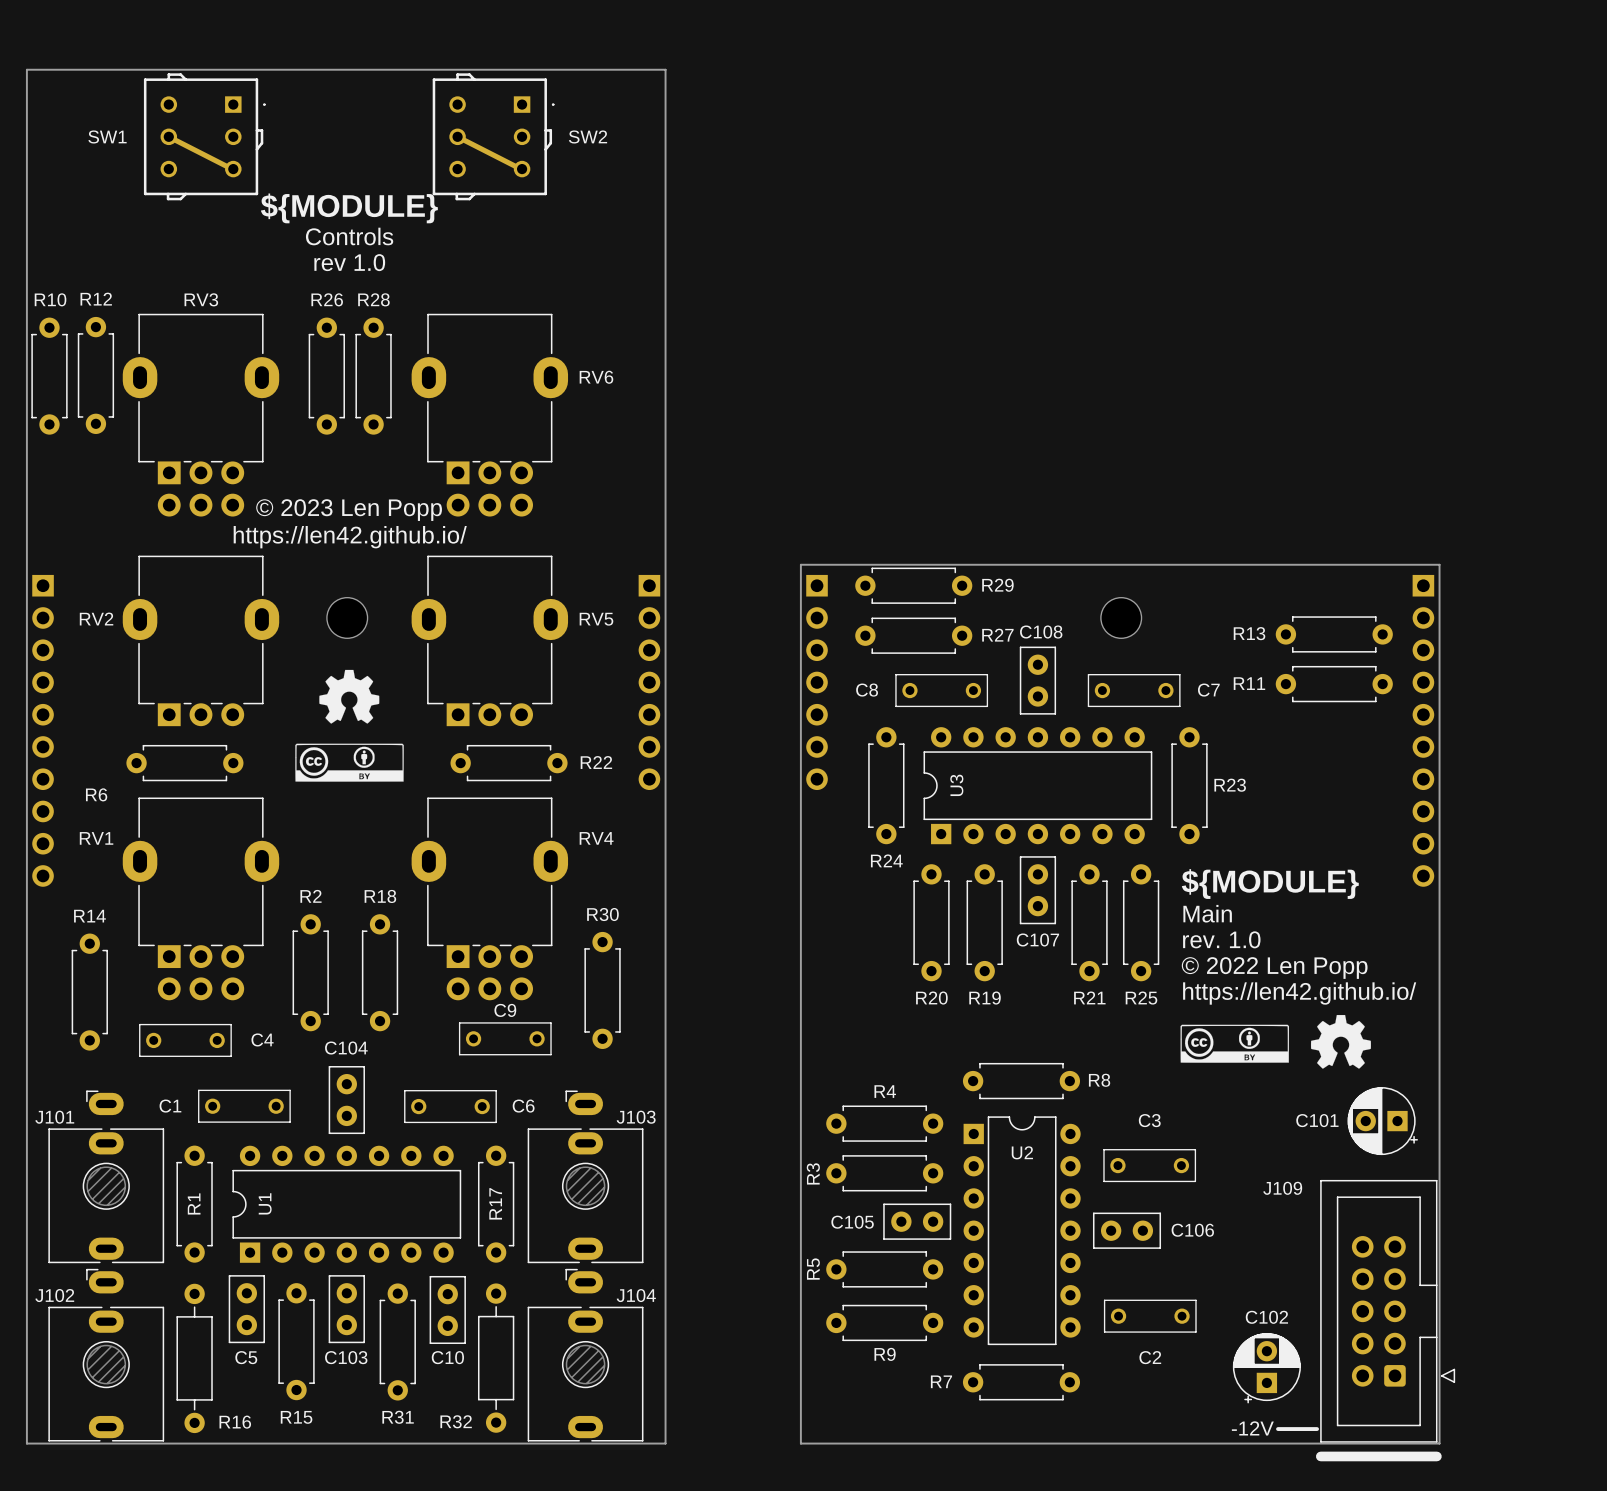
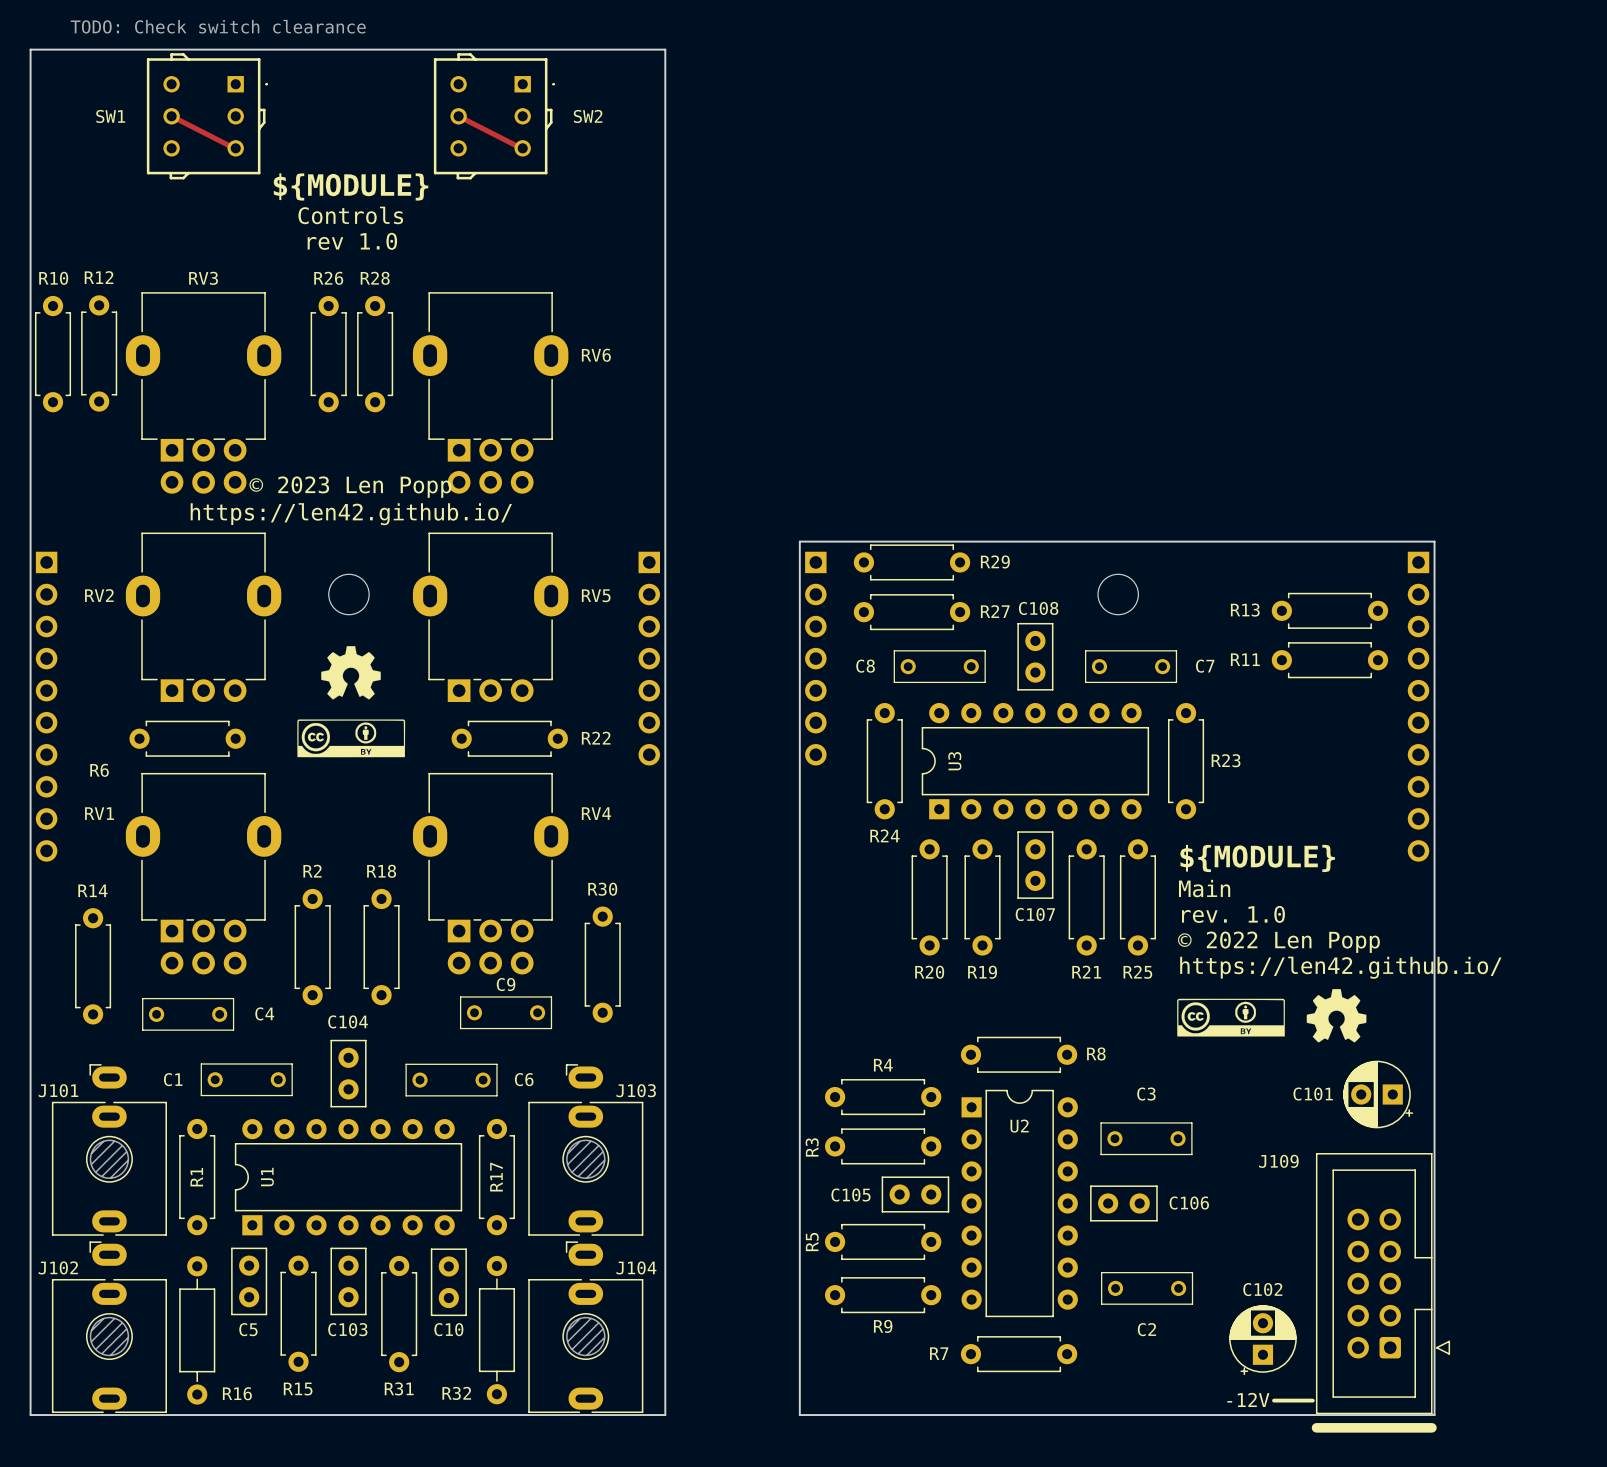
text: none -> TODO: Check switch clearance (218, 26)

